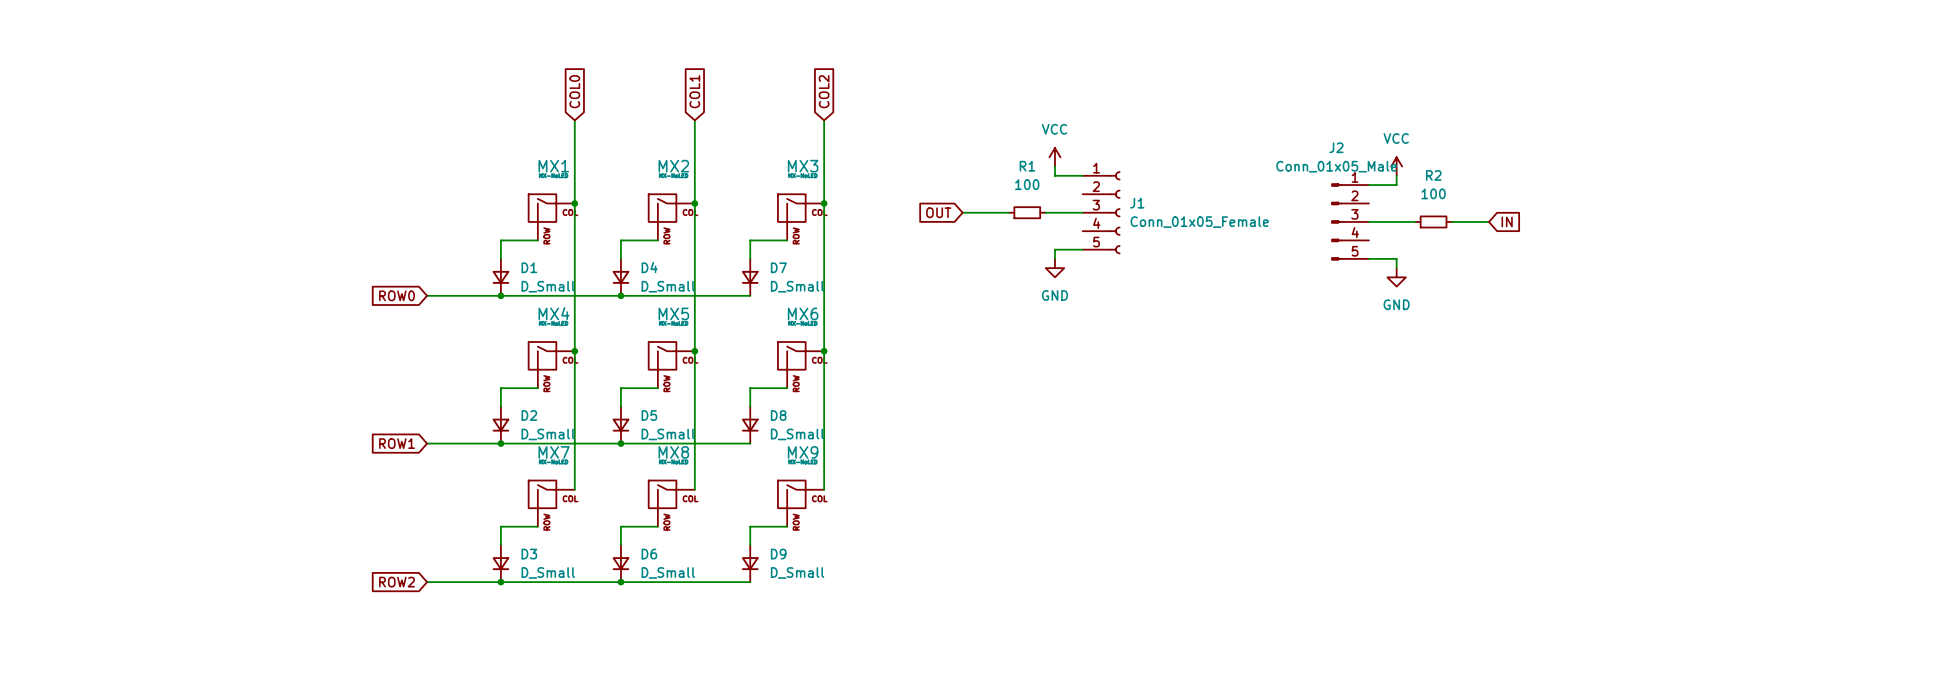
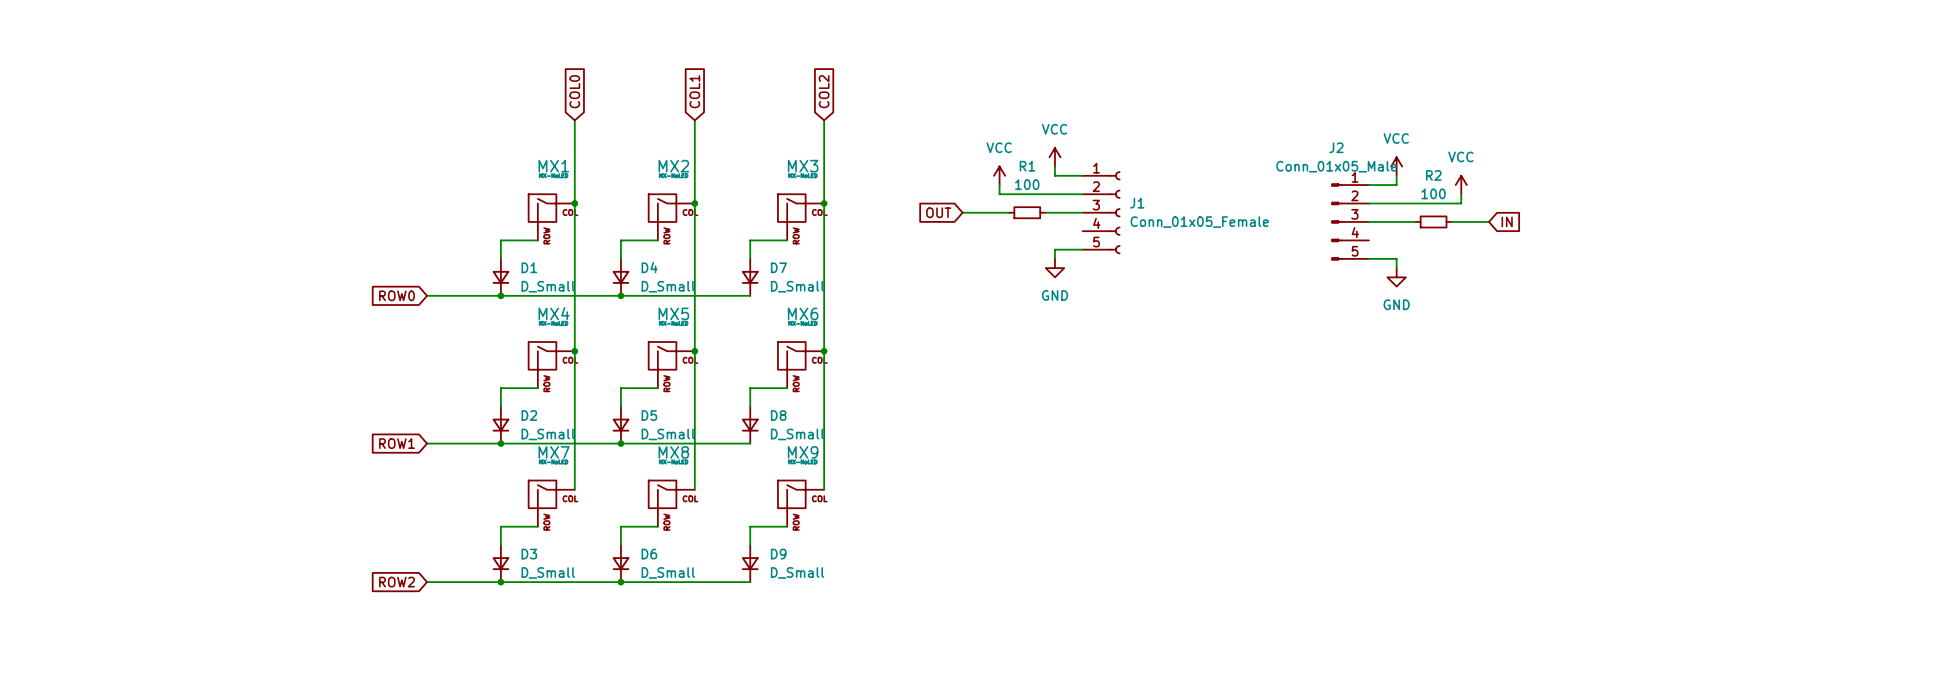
power symbol: none -> VCC (999, 175)
wire: none -> (999, 185) (999, 194) (1082, 194)
power symbol: none -> VCC (1461, 185)
wire: none -> (1461, 194) (1461, 203) (1368, 203)

